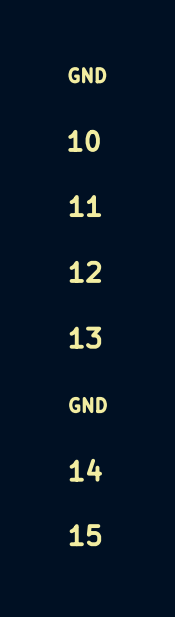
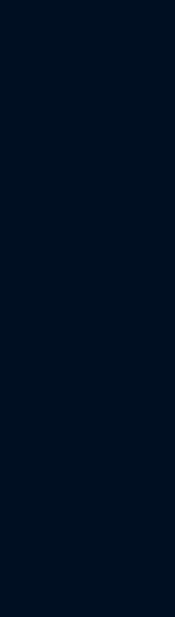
text: GND (87, 75) -> none
text: 10 (84, 140) -> none
text: 11 (85, 206) -> none
text: 12 (85, 271) -> none
text: 13 (85, 337) -> none
text: GND (88, 405) -> none
text: 14 (85, 470) -> none
text: 15 (85, 535) -> none

